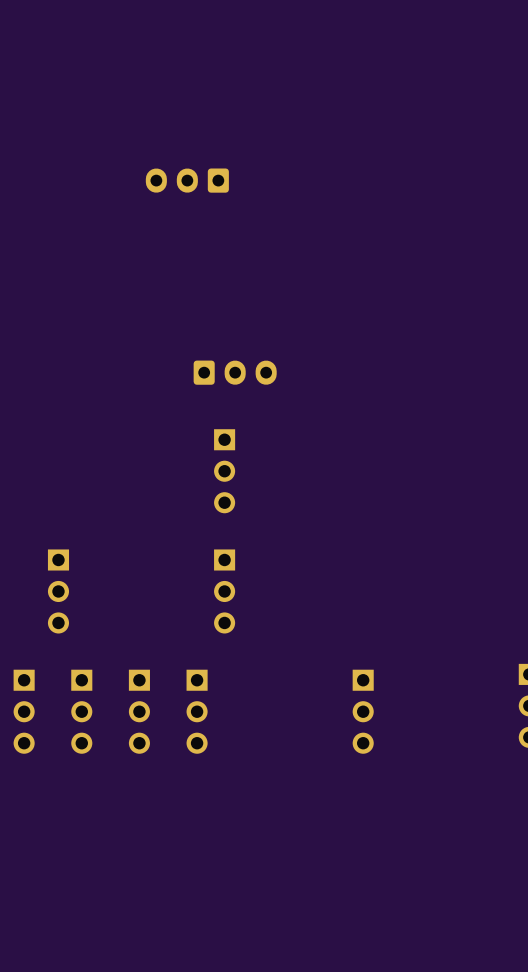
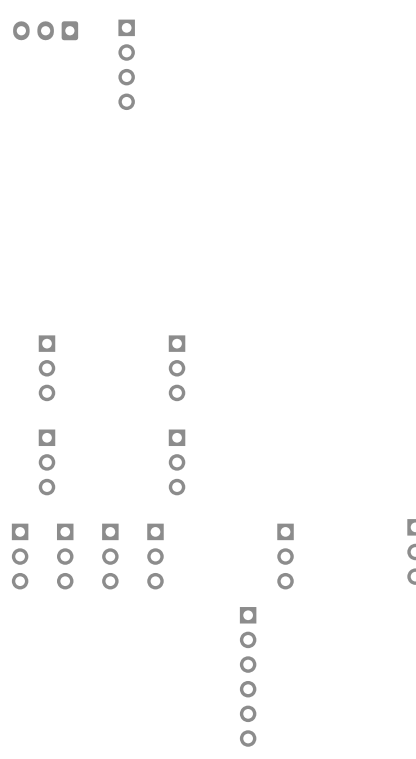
part: none -> (45, 30)
part: none -> (126, 64)
part: (187, 180) -> none
part: (235, 372) -> none
part: none -> (46, 368)
part: none -> (248, 676)

